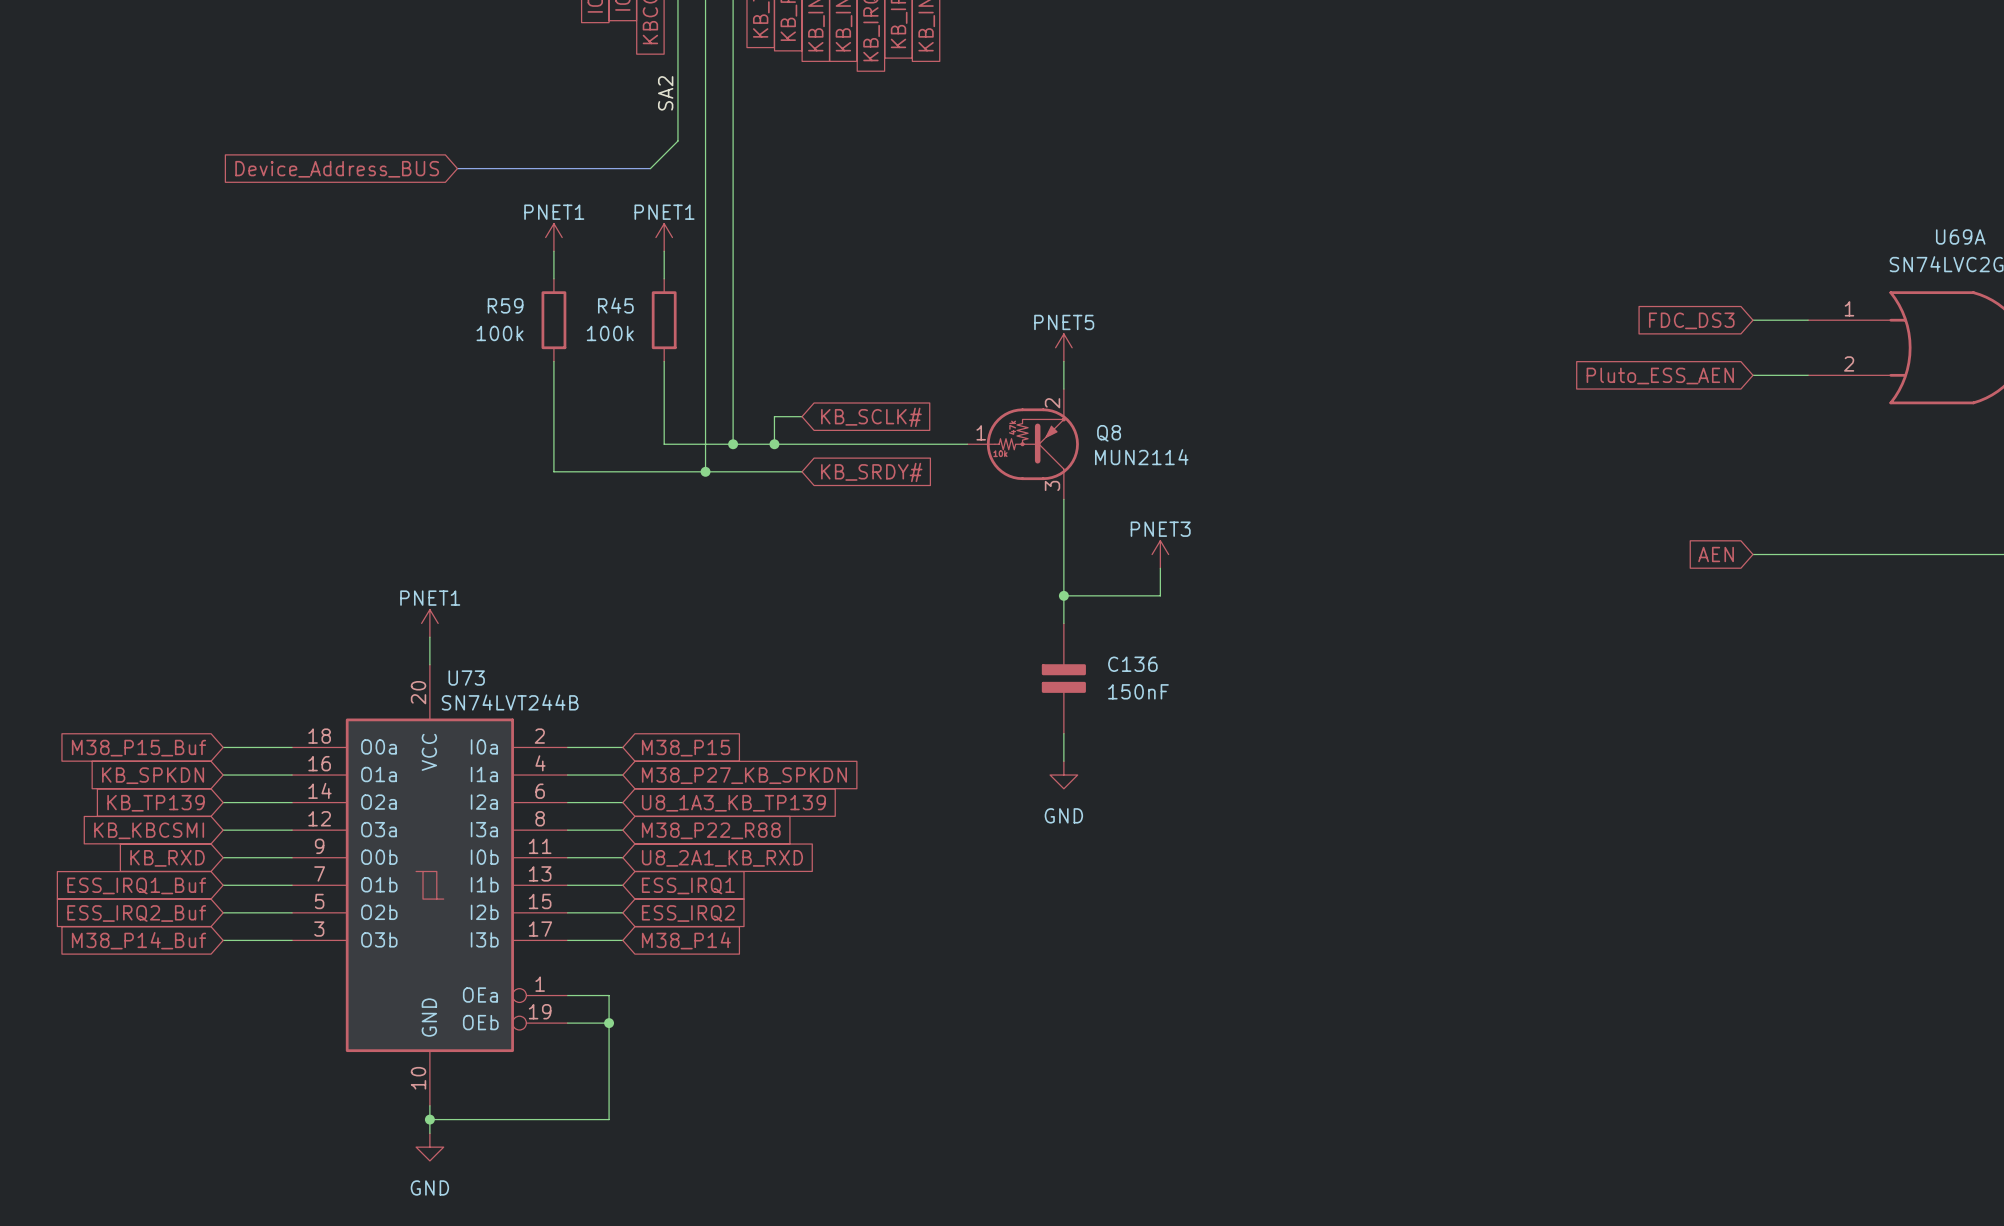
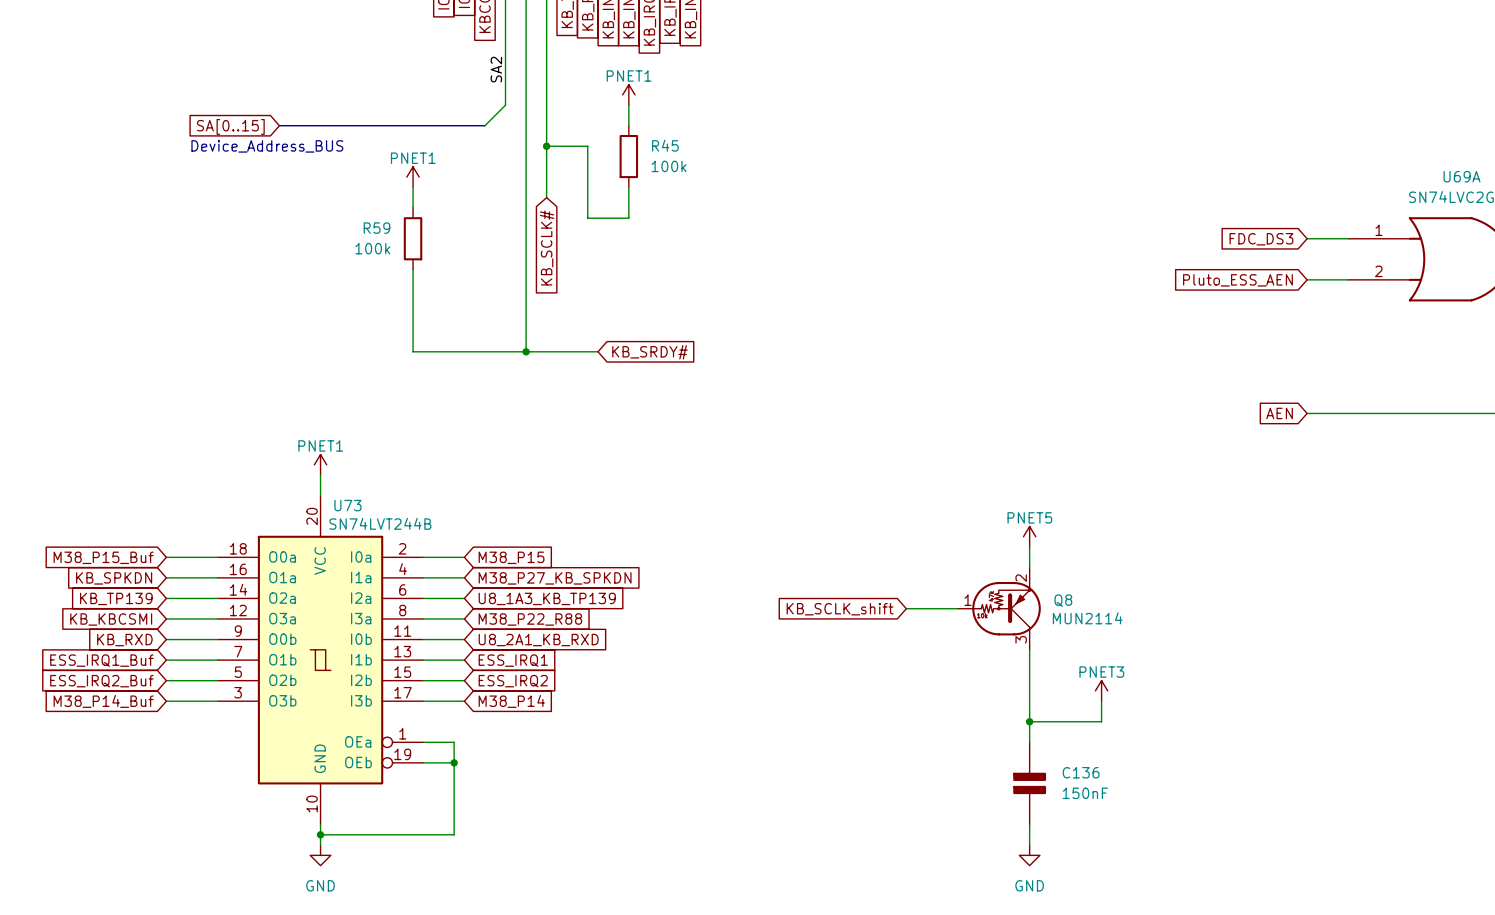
bus: none -> (279, 125) (341, 125)
global label: Device_Address_BUS (337, 169) -> none
global label: none -> SA[0..15] (230, 126)
text: none -> Device_Address_BUS (267, 146)
wire: none -> (546, 146) (587, 146) (587, 218) (628, 218) (628, 187)
junction: none -> (546, 146)
power symbol position: PNET1 (664, 237) -> PNET1 (628, 94)
wire: (664, 251) (664, 278) -> (628, 105) (628, 125)
wire: (733, 265) (733, 444) -> none
R45 name position: R45 (615, 305) -> R45 (665, 145)
R45 position: (664, 320) -> (628, 156)
R45 value position: 100k (610, 333) -> 100k (669, 166)
power symbol: PNET5 (1063, 347) -> none
wire: (664, 361) (664, 444) (967, 444) -> none
wire: (1063, 361) (1063, 389) -> none
wire: (802, 416) (774, 416) (774, 444) -> none
global label rotation: 0° (871, 417) -> 90° clockwise (547, 247)
global label position: KB_SCLK# (871, 417) -> KB_SCLK# (547, 247)
junction: (733, 444) -> none
junction: (774, 444) -> none
Q8 position: (1023, 444) -> (999, 608)
wire: (1063, 499) (1063, 623) -> none
power symbol: PNET3 (1160, 554) -> none
wire: (1160, 568) (1160, 595) (1063, 595) -> none
junction: (1063, 595) -> none
C136 position: (1063, 678) -> (1029, 783)
power symbol: none -> PNET5 (1029, 536)
wire: (1063, 733) (1063, 761) -> none
wire: none -> (1029, 547) (1029, 567)
power symbol: GND (1063, 775) -> none
wire: none -> (906, 608) (957, 608)
global label: none -> KB_SCLK_shift (840, 609)
wire: none -> (1029, 649) (1029, 742)
power symbol: none -> PNET3 (1101, 690)
wire: none -> (1101, 701) (1101, 721) (1029, 721)
junction: none -> (1029, 721)
wire: none -> (1029, 824) (1029, 845)
power symbol: none -> GND (1029, 855)

